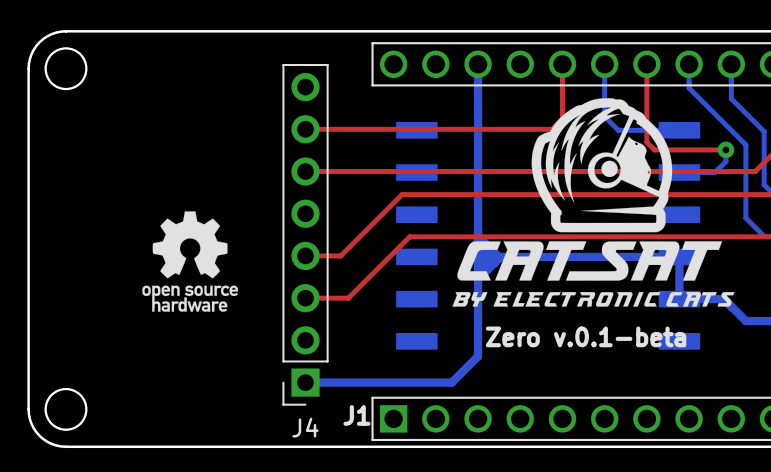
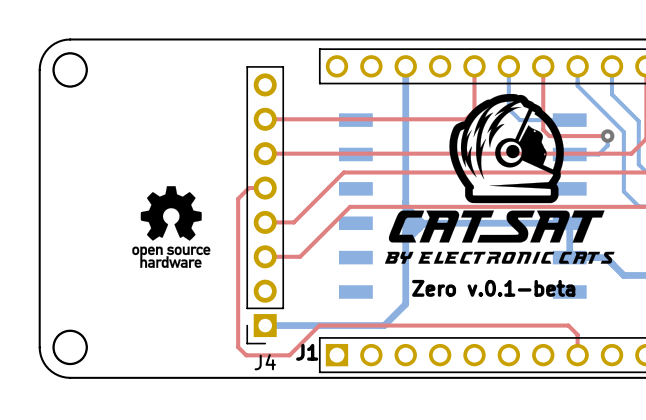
top track: none -> (265, 188) (248, 188) (238, 198) (238, 347) (246, 355) (289, 355) (319, 325) (568, 325) (577, 334) (577, 355)

